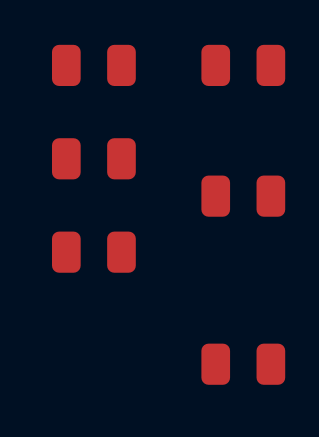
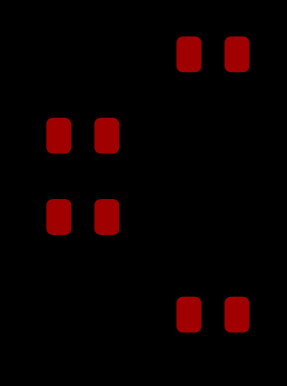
part: (93, 65) -> none
part: (243, 196) -> none

